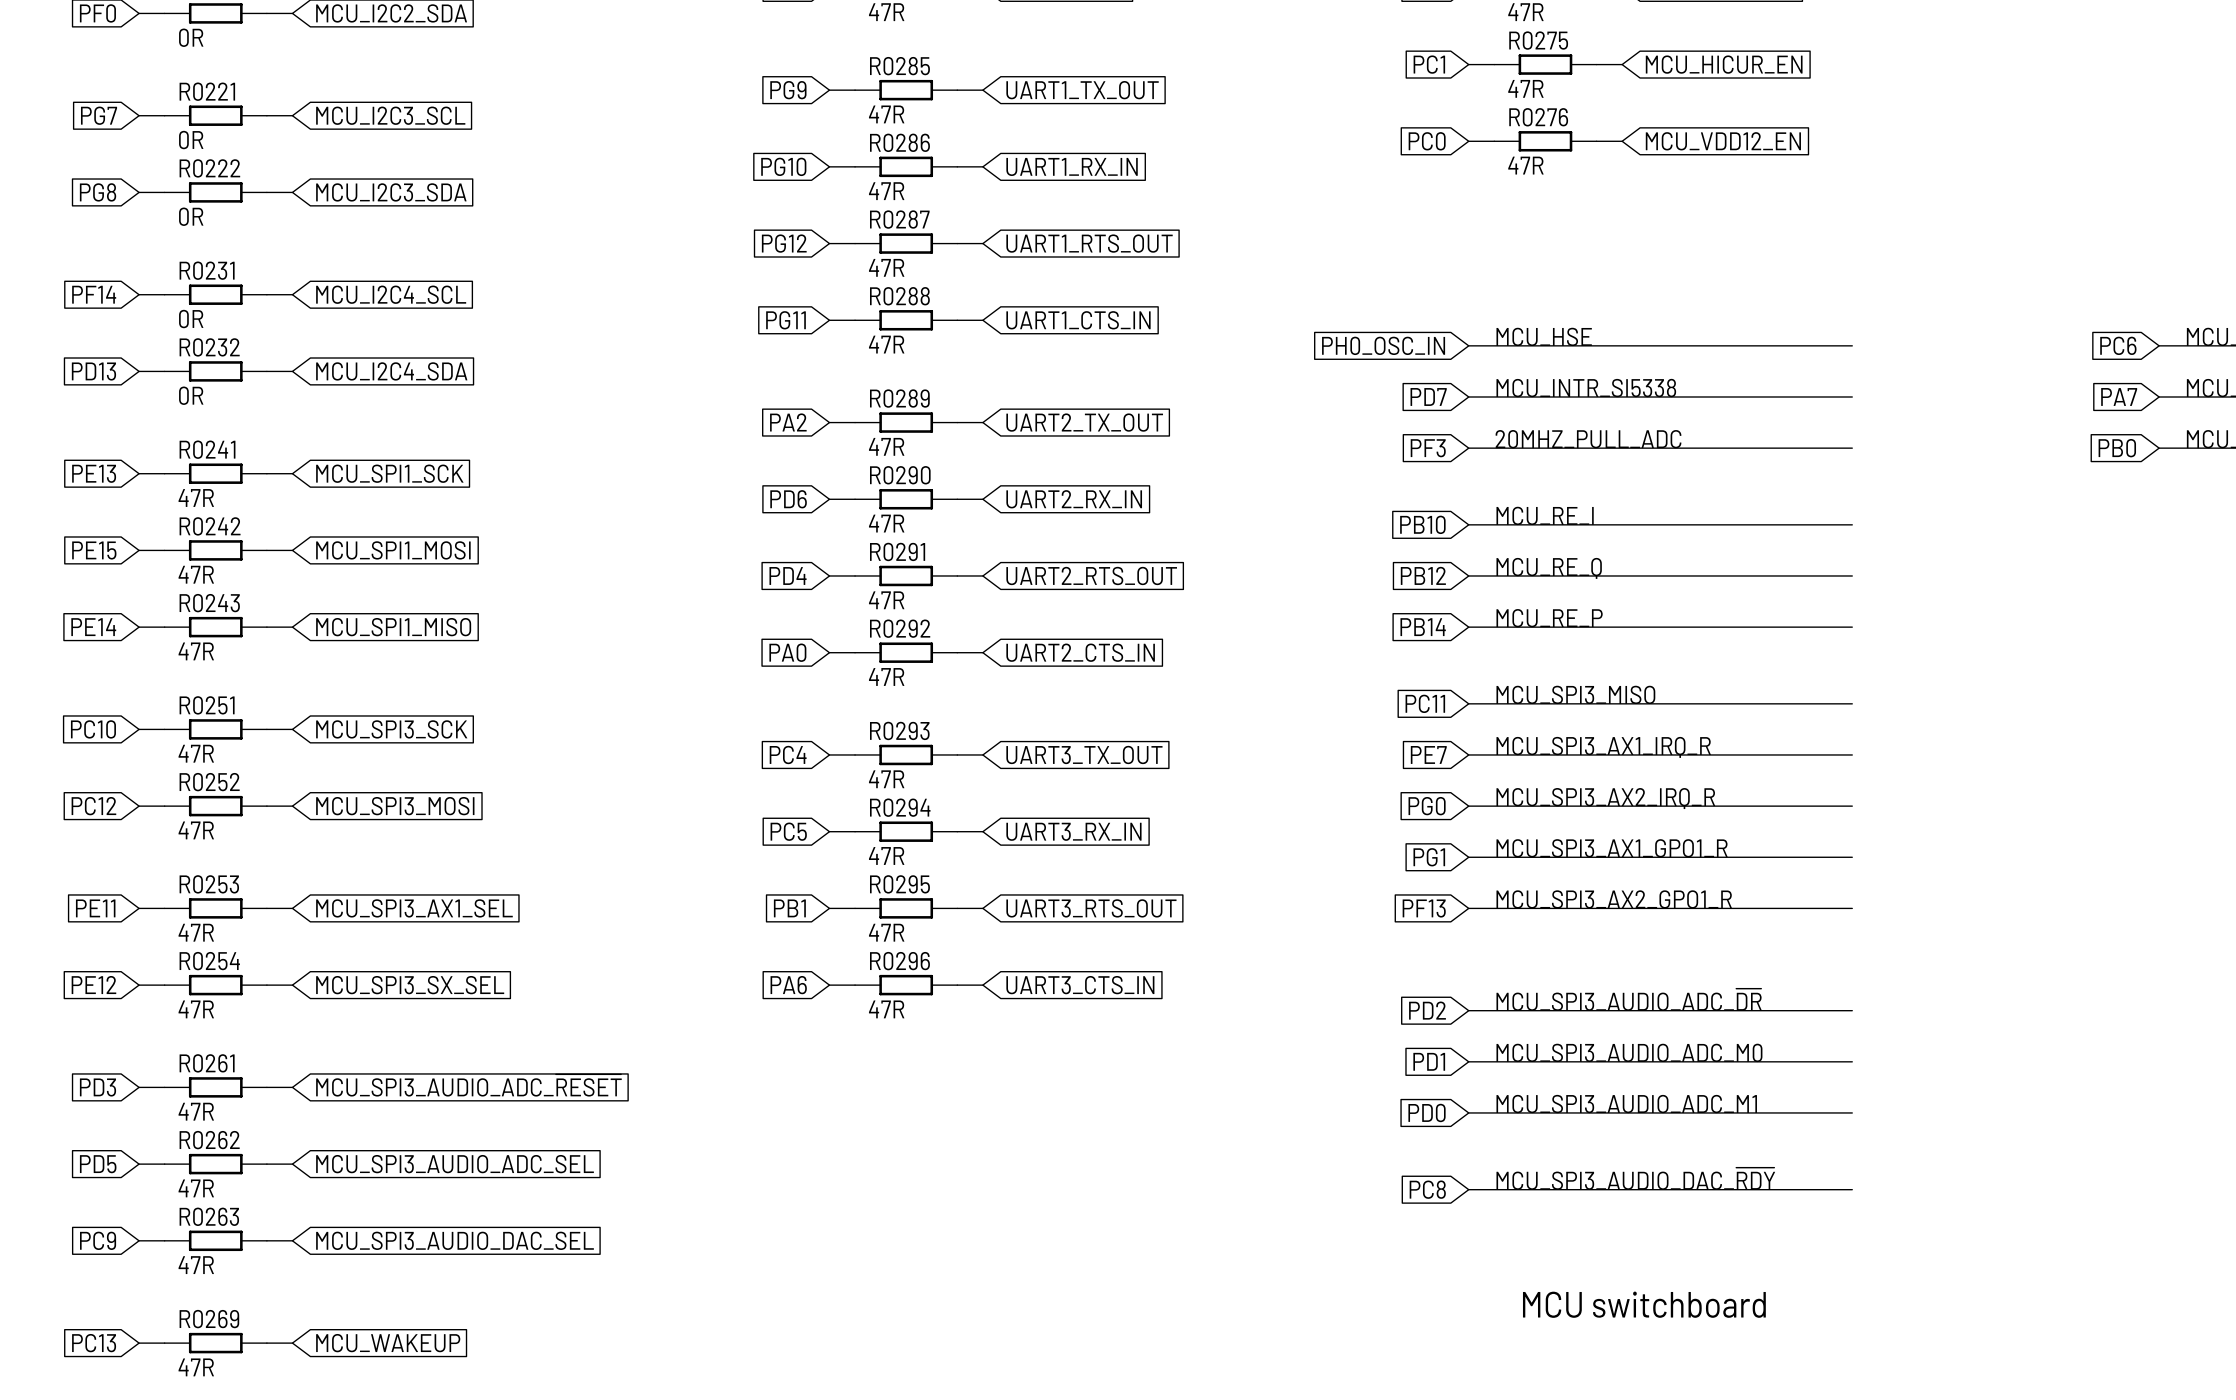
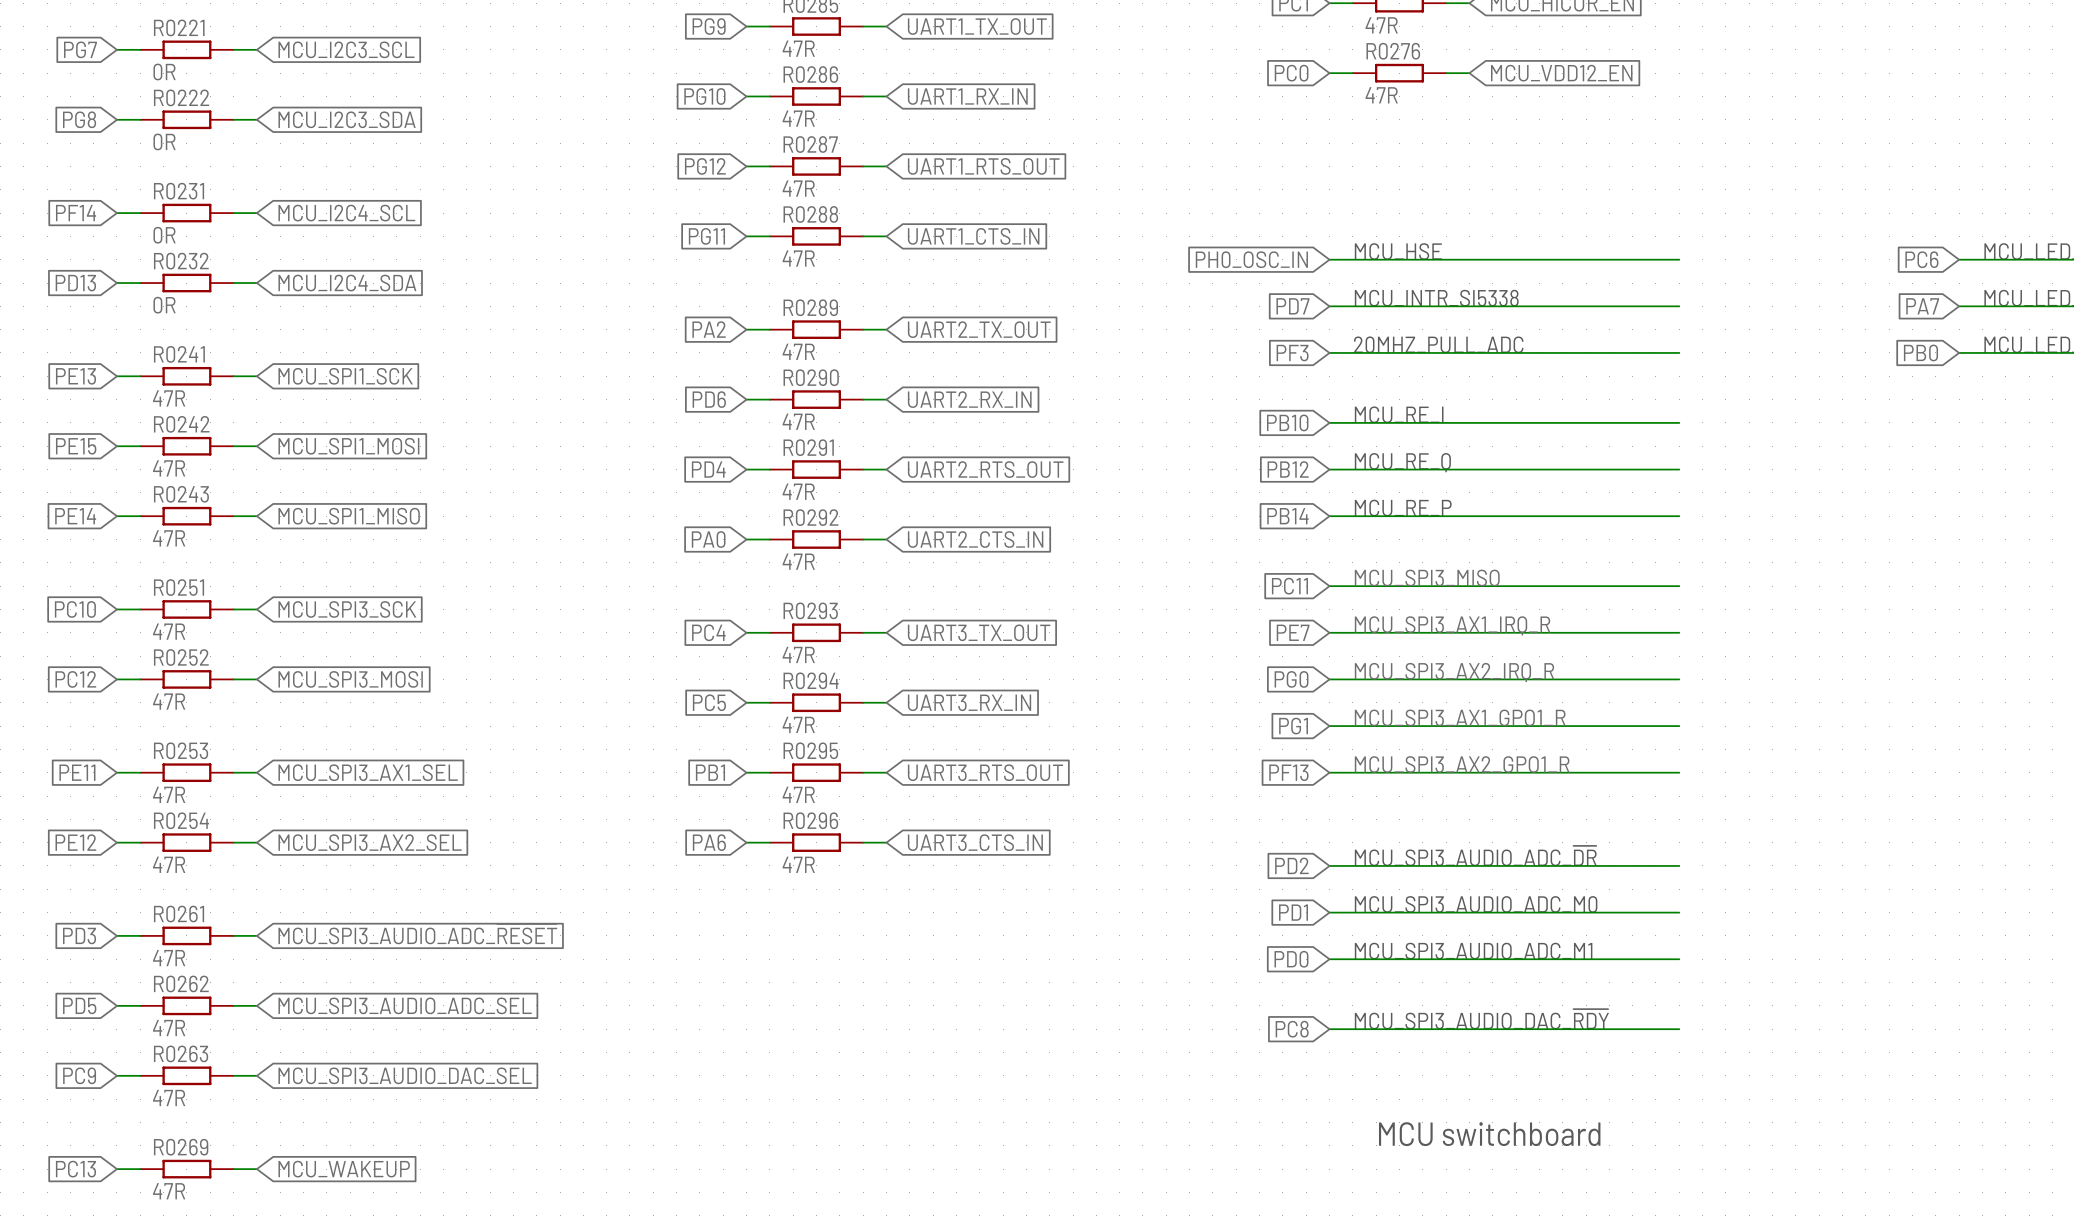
global label: MCU_SPI3_SX_SEL (410, 985) -> MCU_SPI3_AX2_SEL (370, 842)

